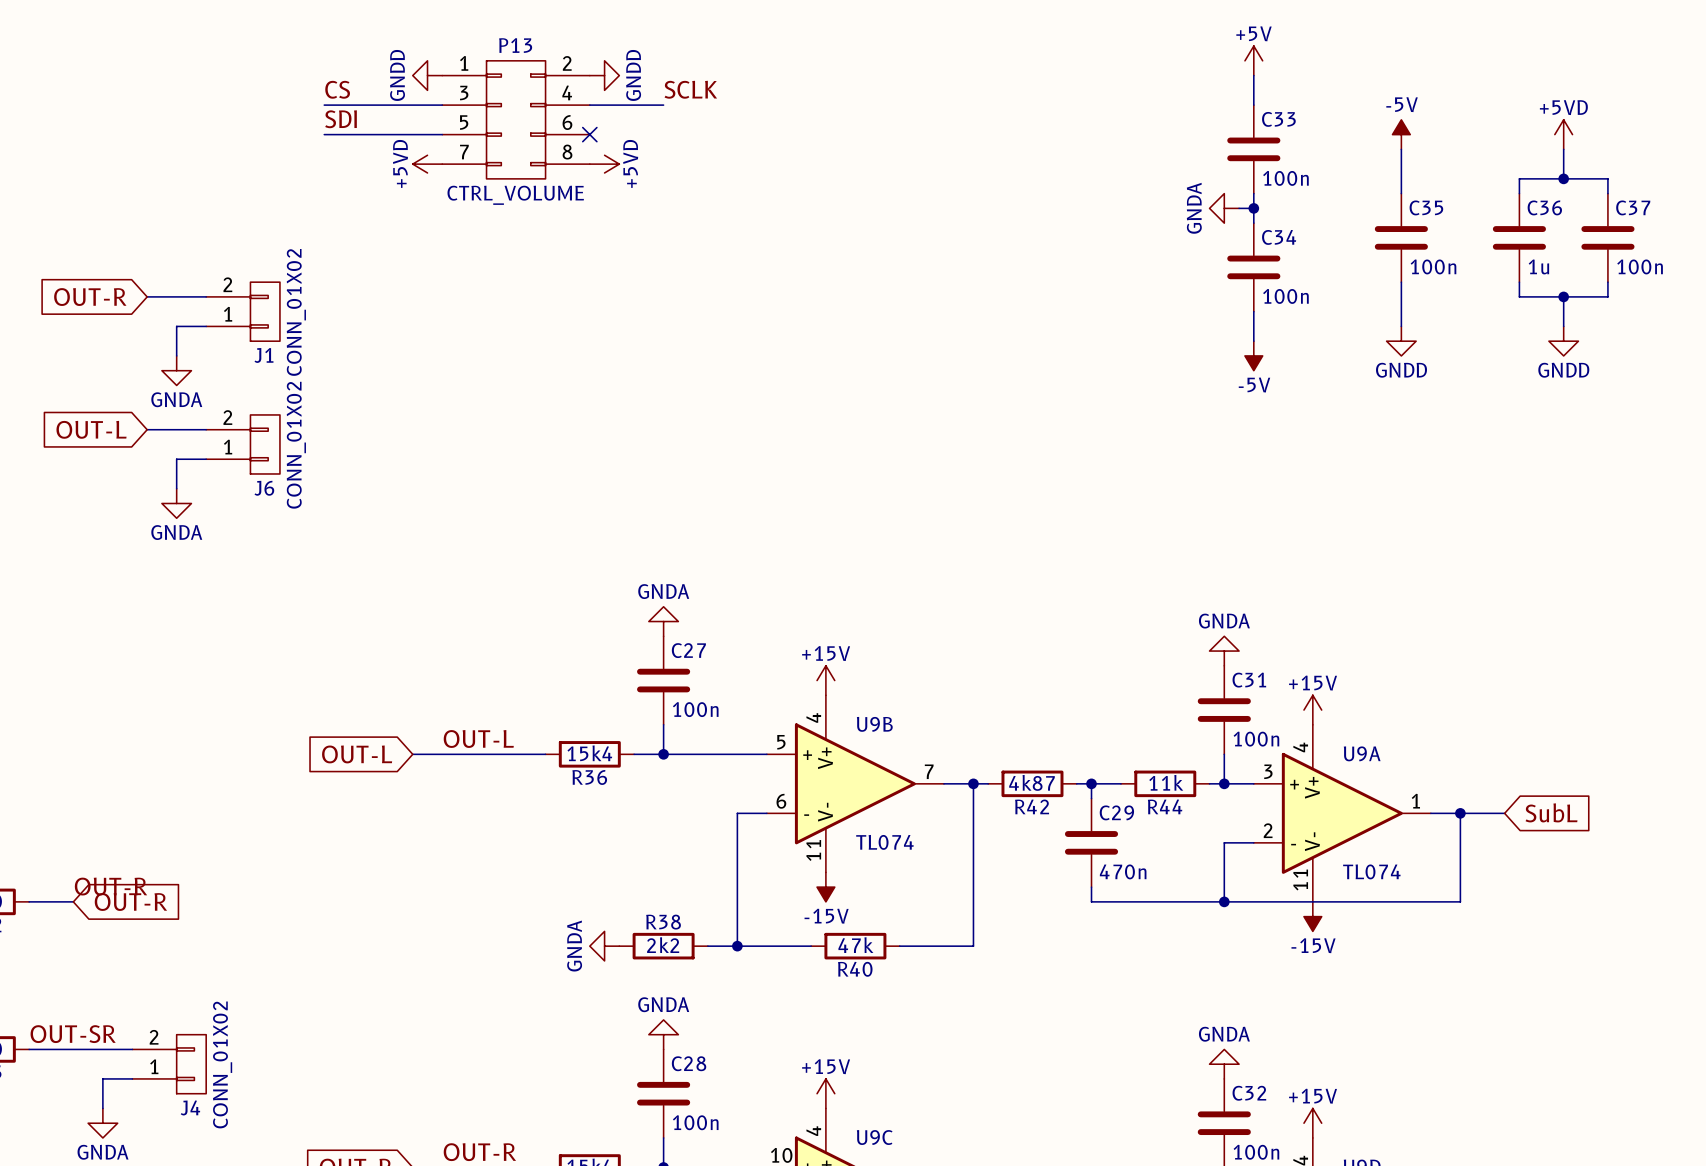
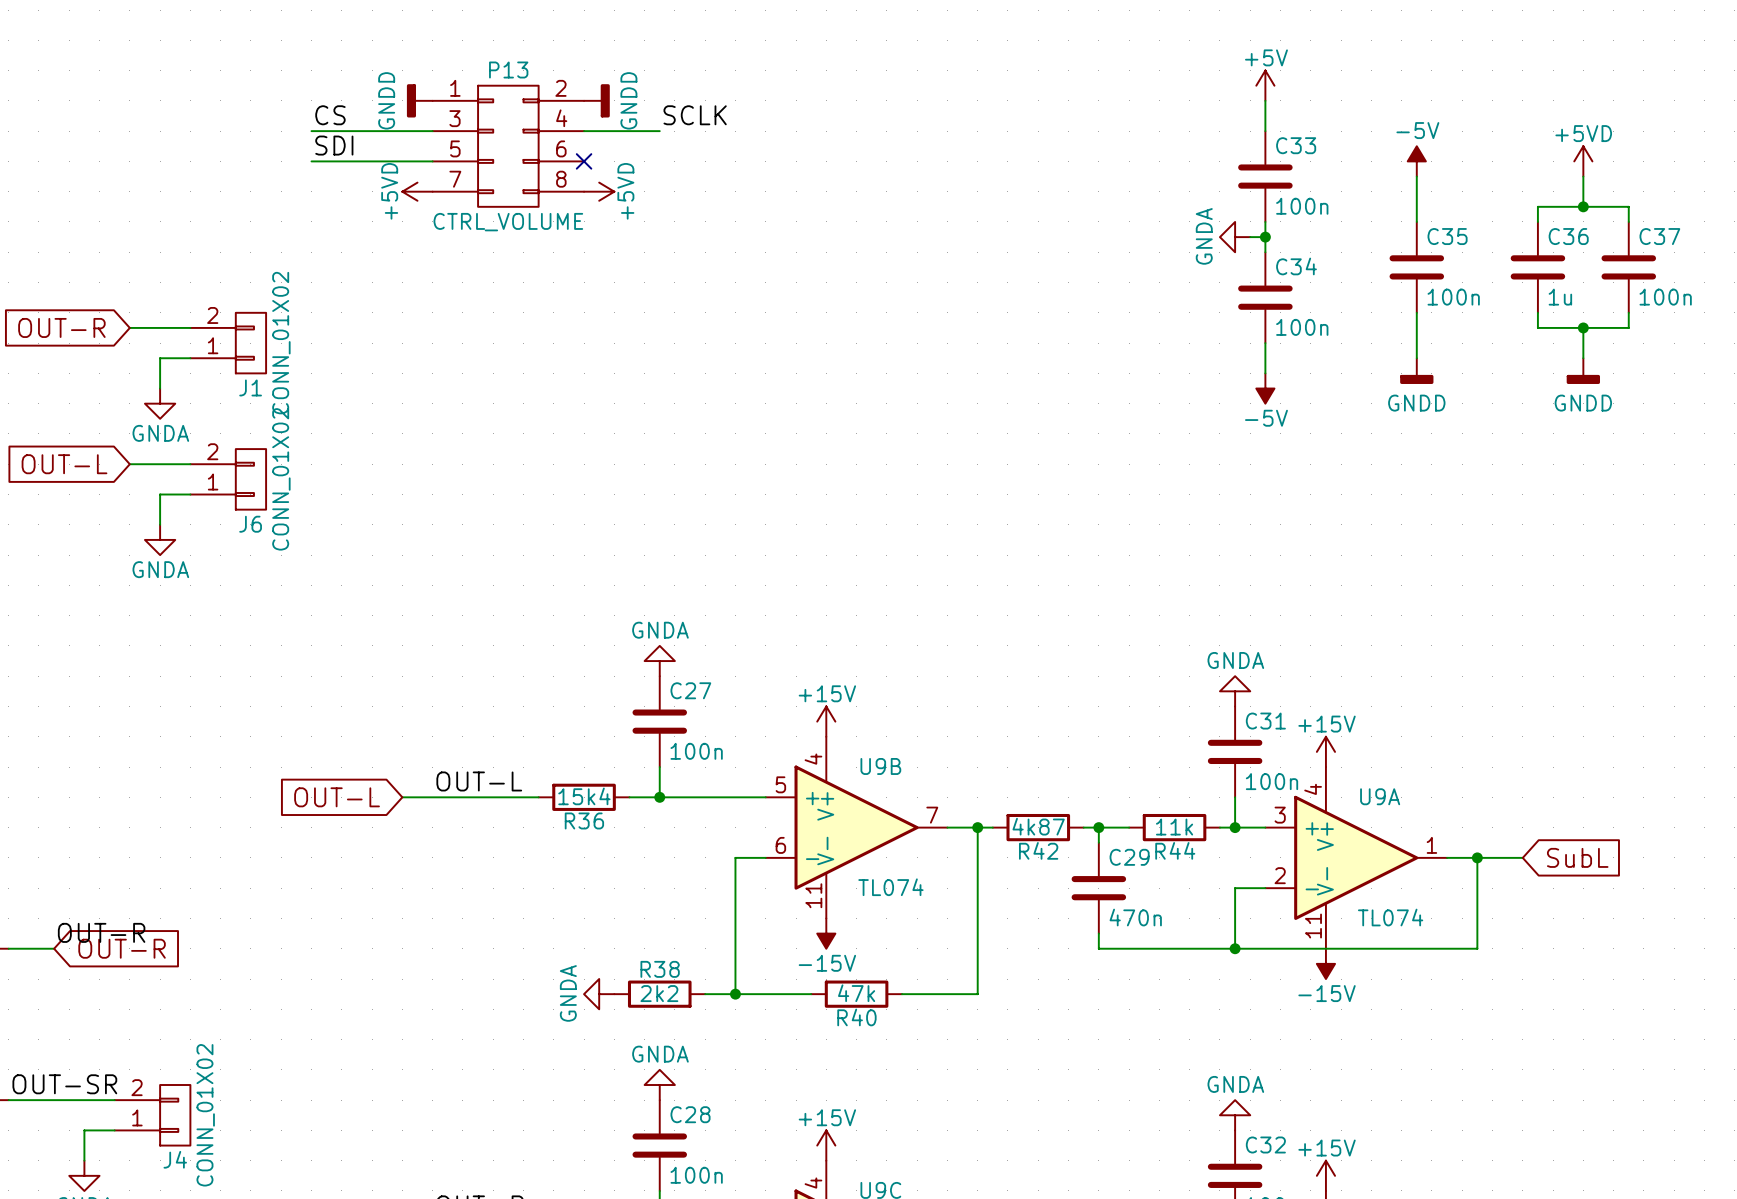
power symbol shape: [412, 60, 443, 91] -> [406, 84, 433, 118]
power symbol shape: [589, 60, 620, 91] -> [584, 84, 610, 118]
power symbol shape: [1386, 326, 1417, 356] -> [1400, 358, 1434, 384]
power symbol shape: [1548, 326, 1579, 356] -> [1566, 358, 1601, 384]

